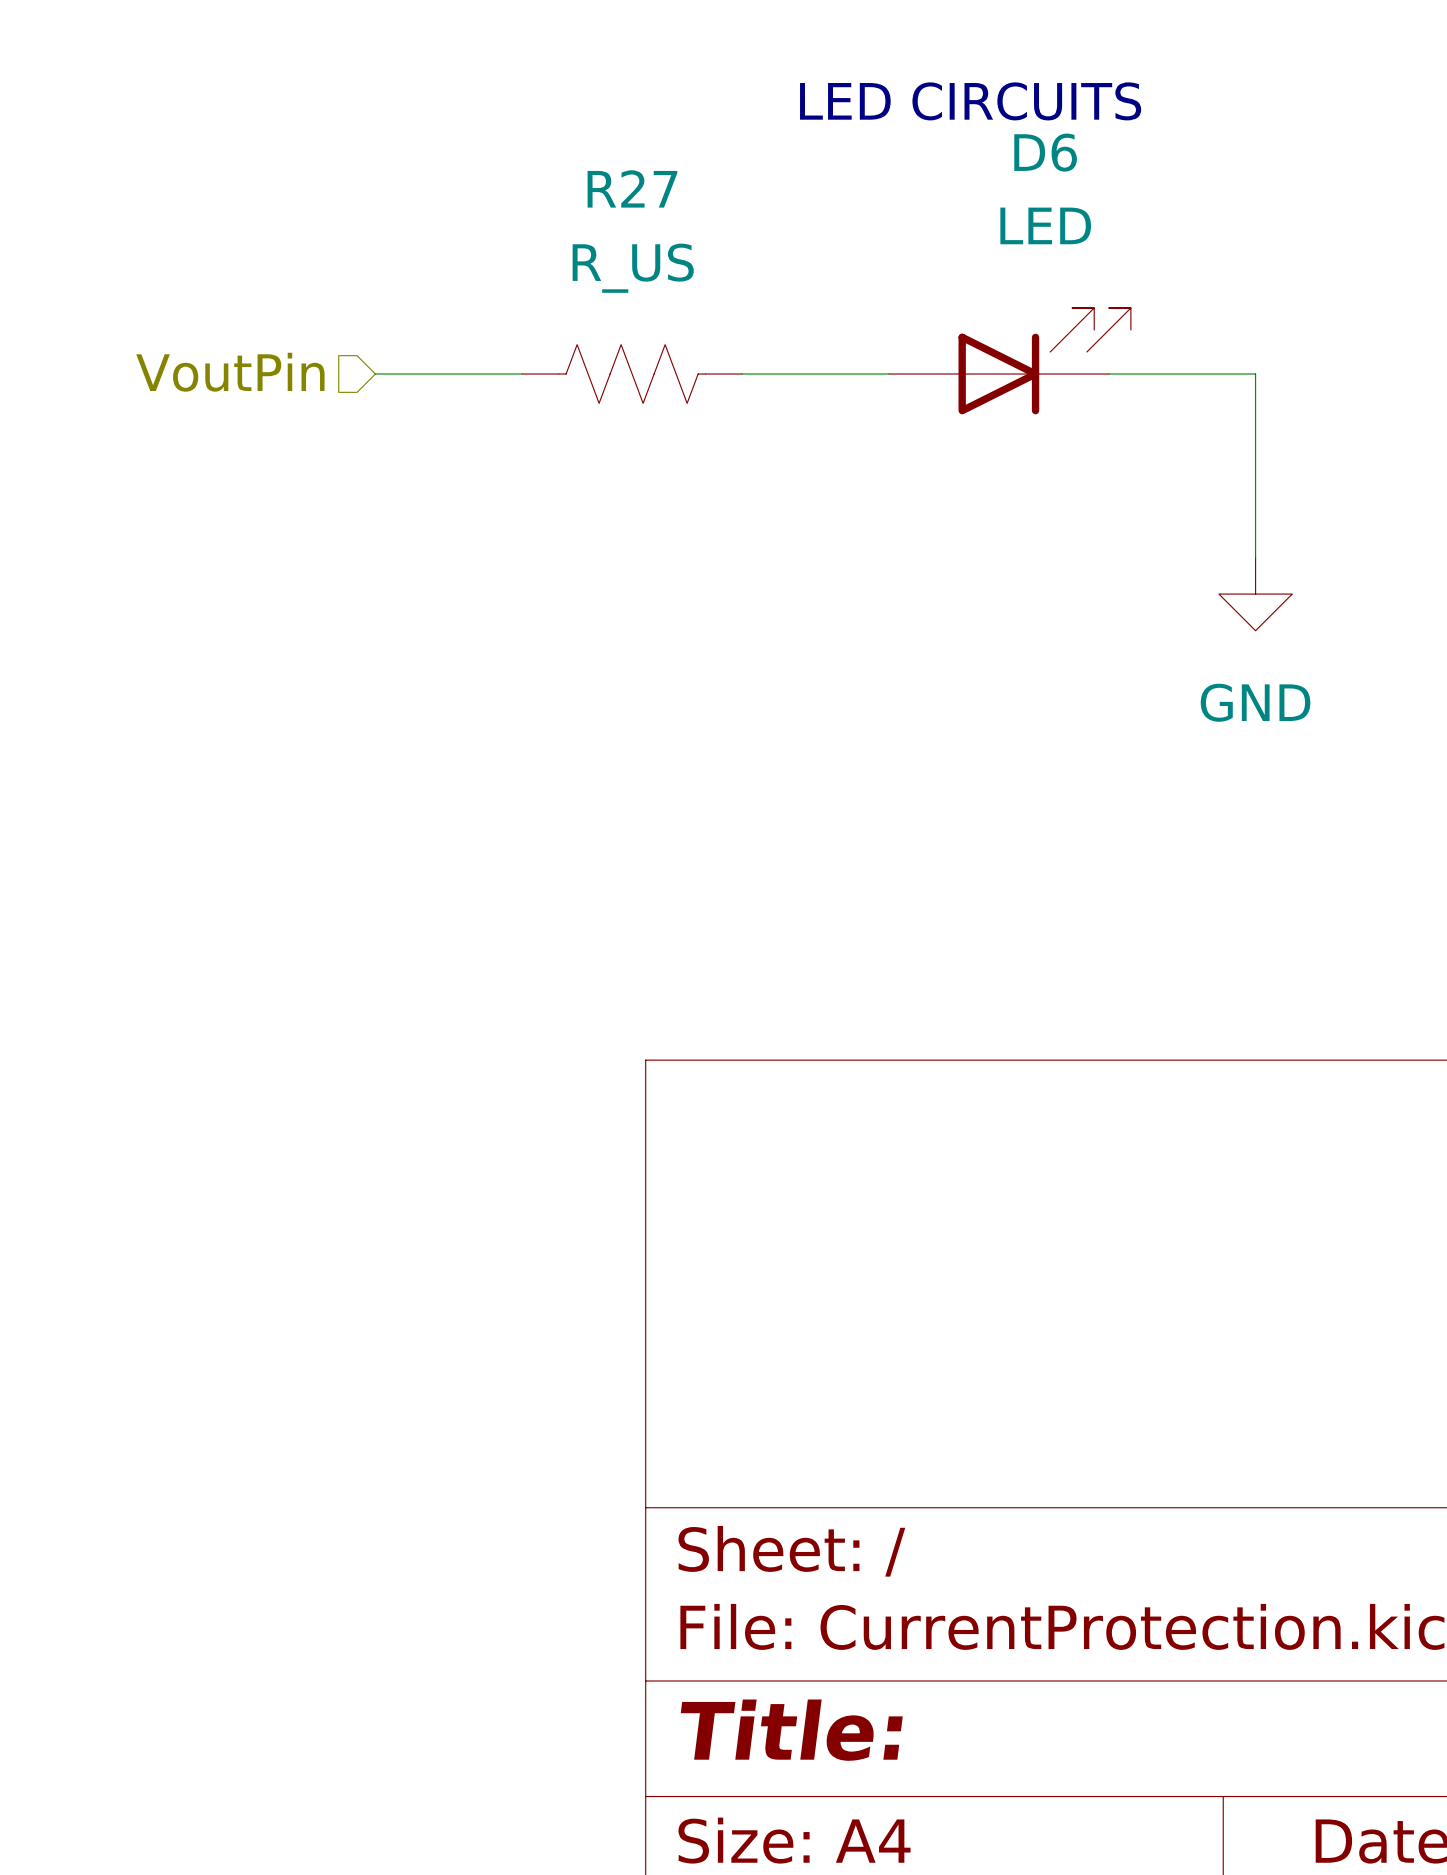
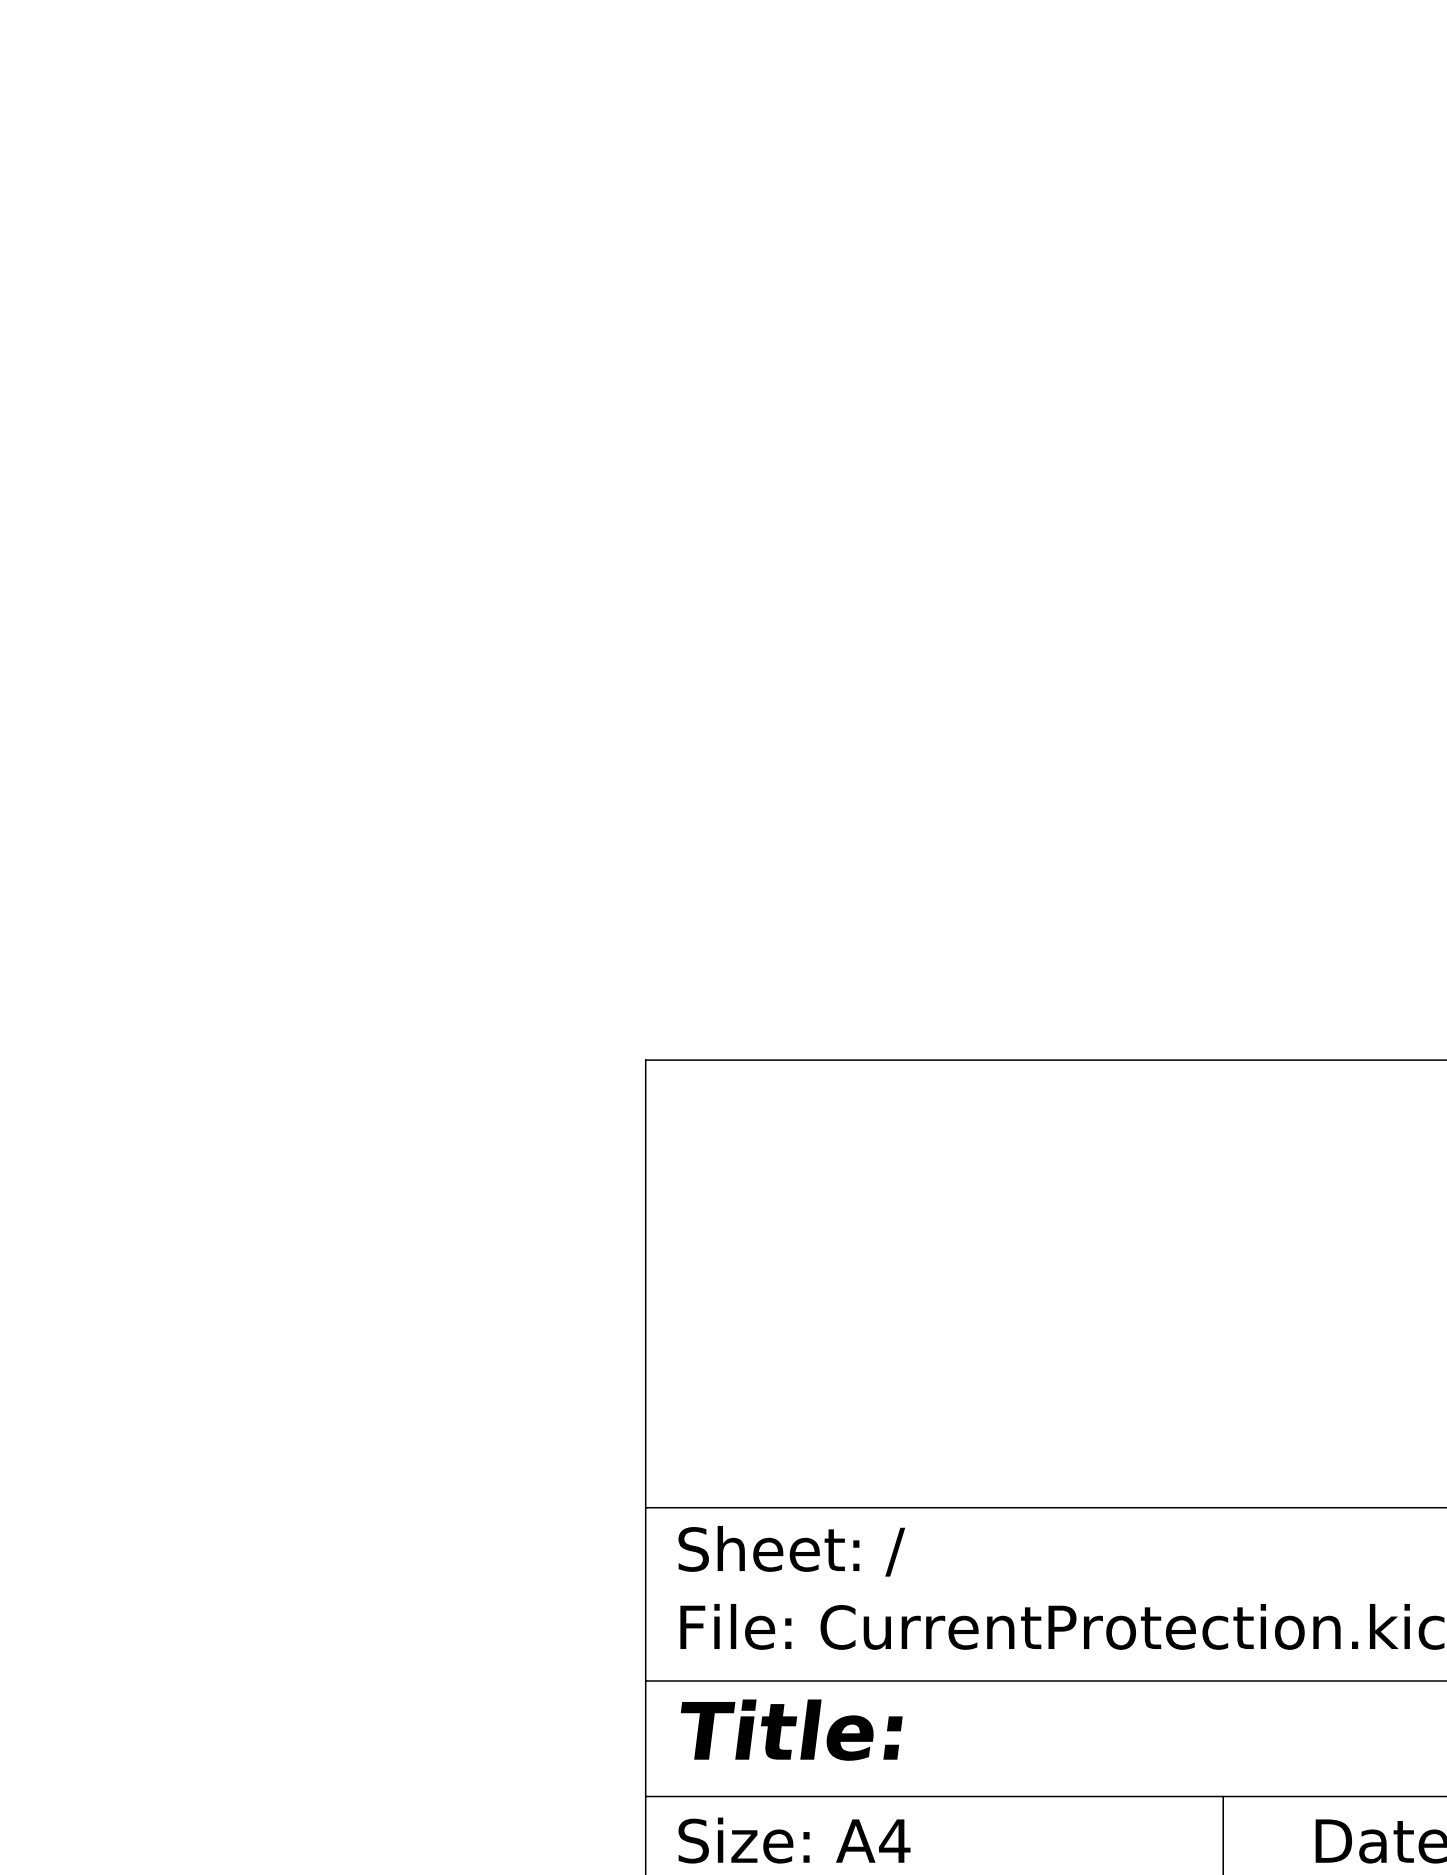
text: LED CIRCUITS (970, 101) -> none
D6: LED (1009, 361) -> none
hierarchical label: VoutPin (230, 372) -> none
wire: (375, 374) (522, 374) -> none
R27: R_US (632, 374) -> none
wire: (742, 374) (888, 374) -> none
wire: (1108, 374) (1255, 374) (1255, 557) -> none
power symbol: GND (1255, 594) -> none

